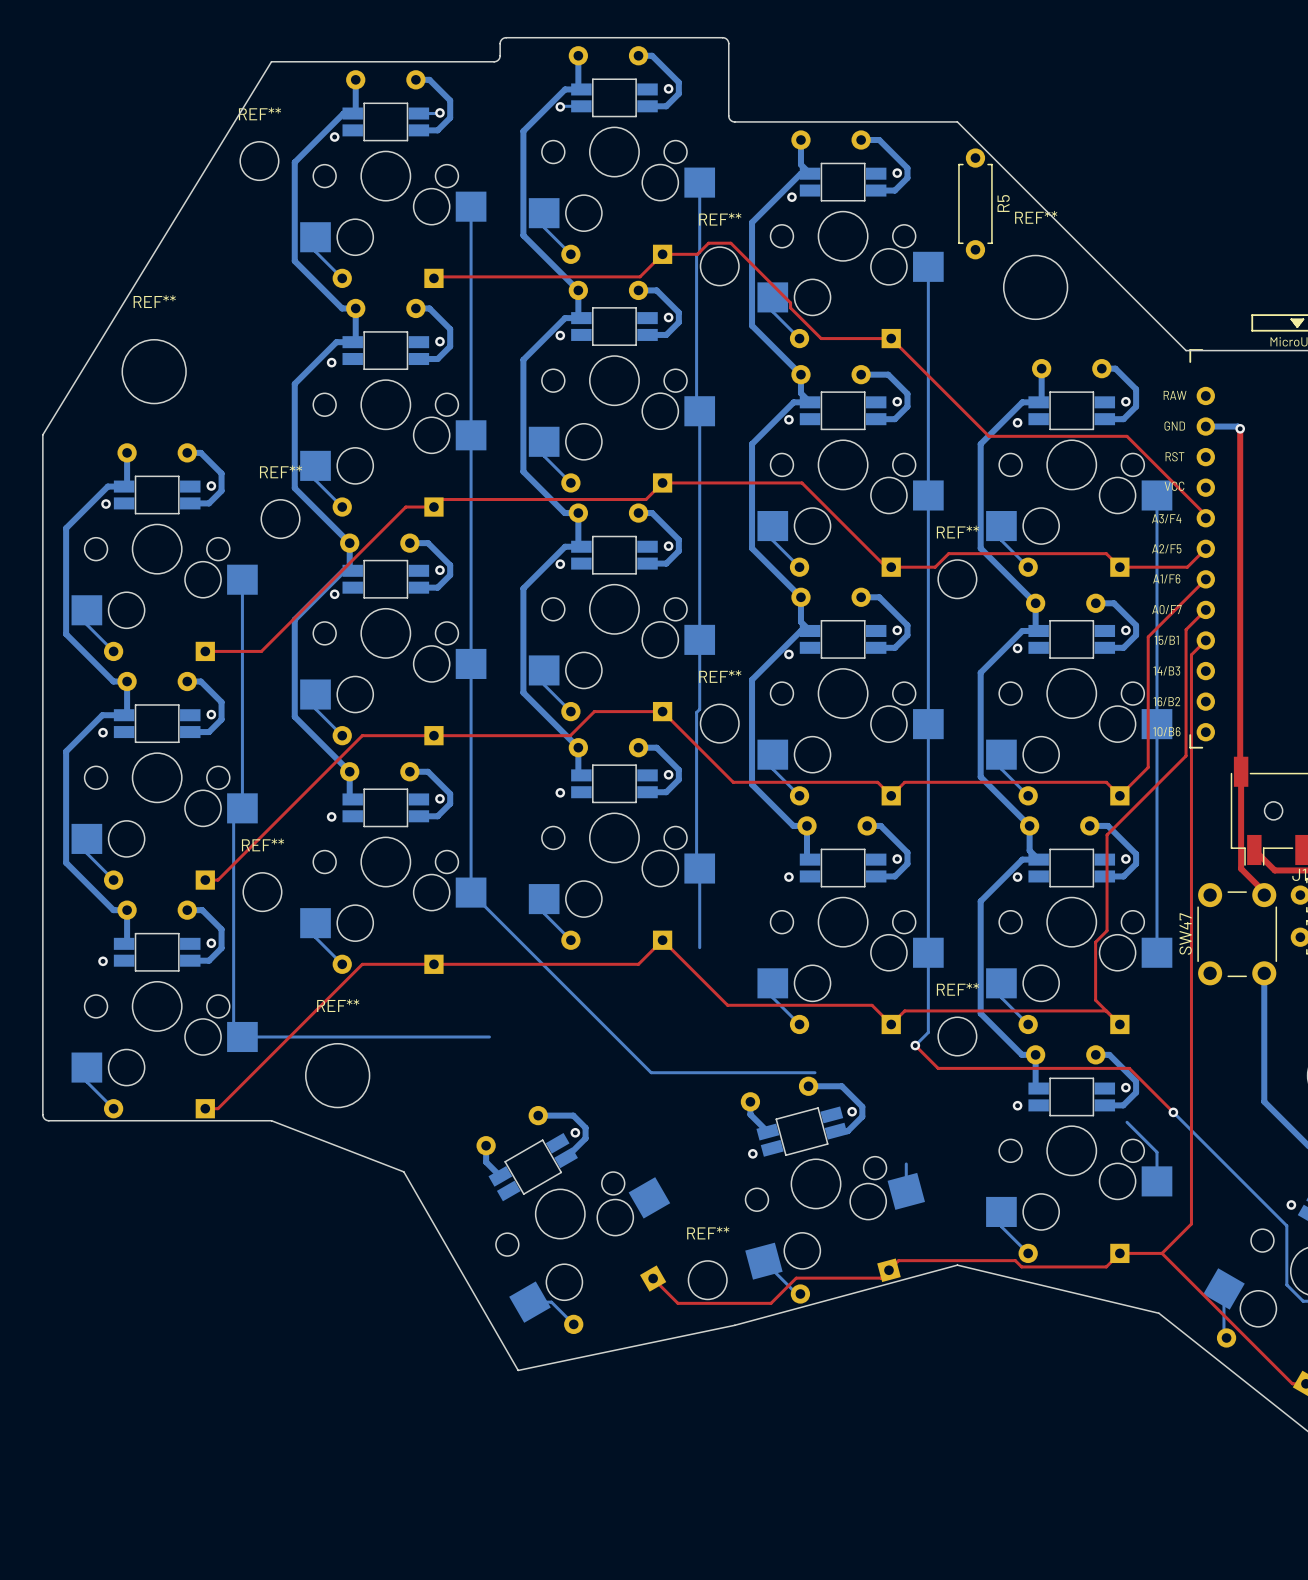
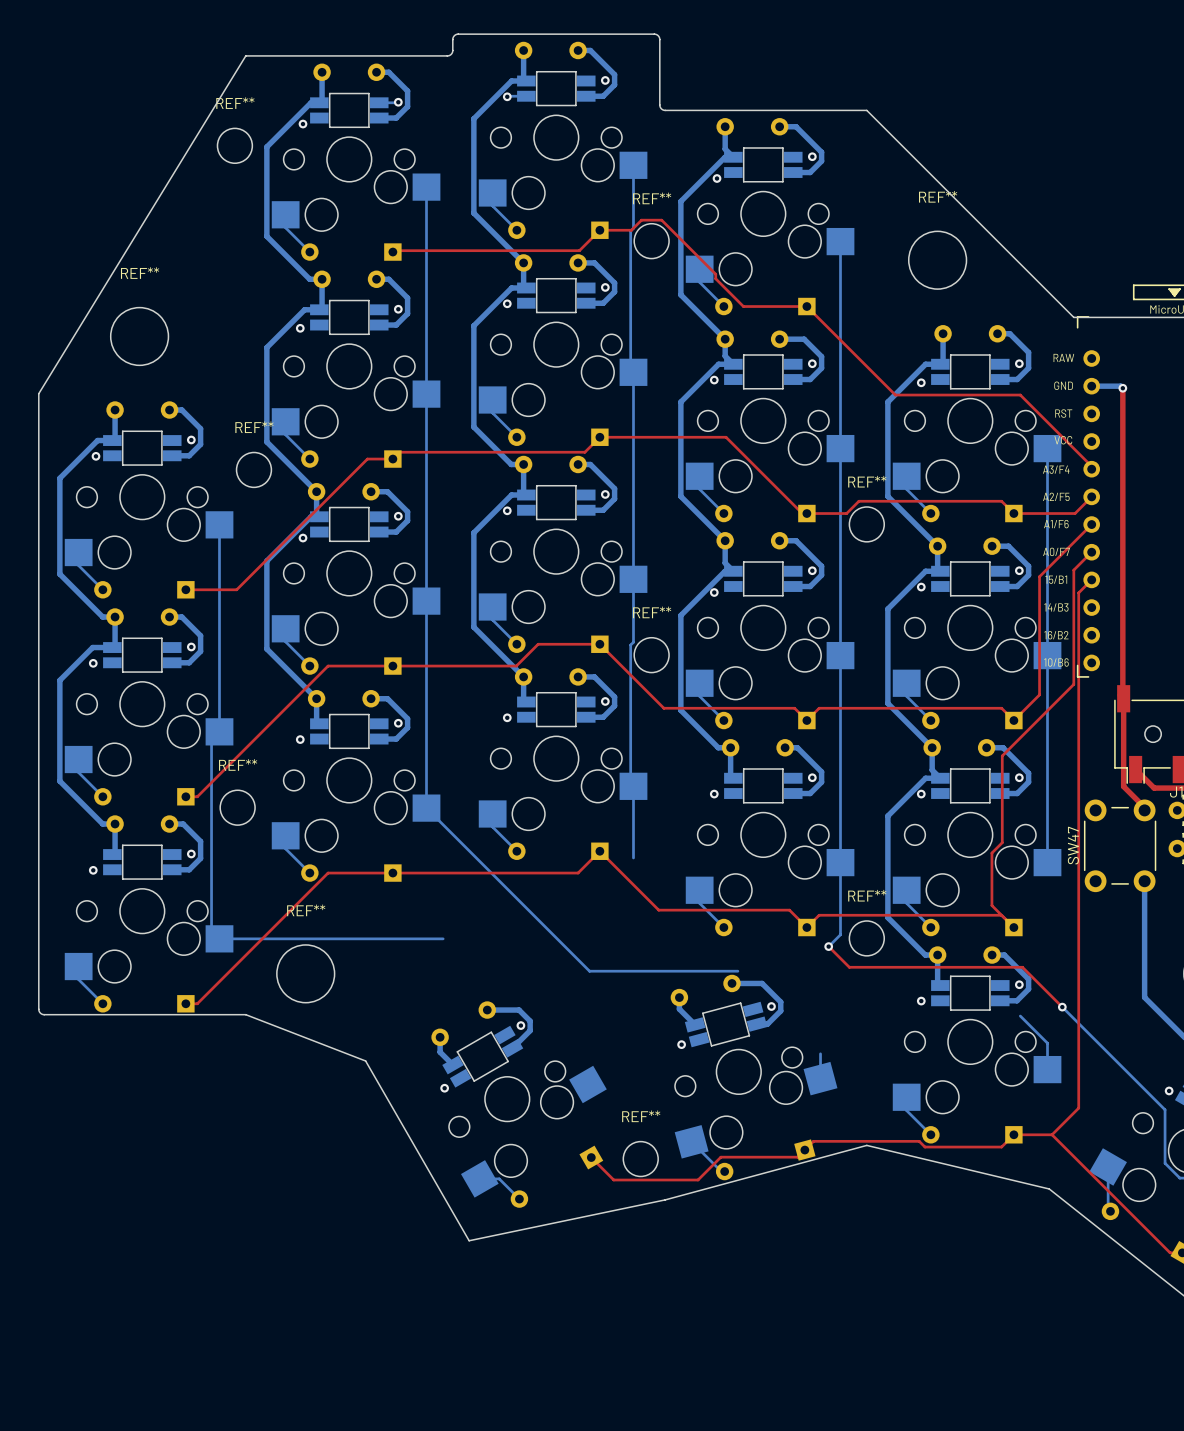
R5: (975, 203) -> none
via: none -> (444, 1088)

